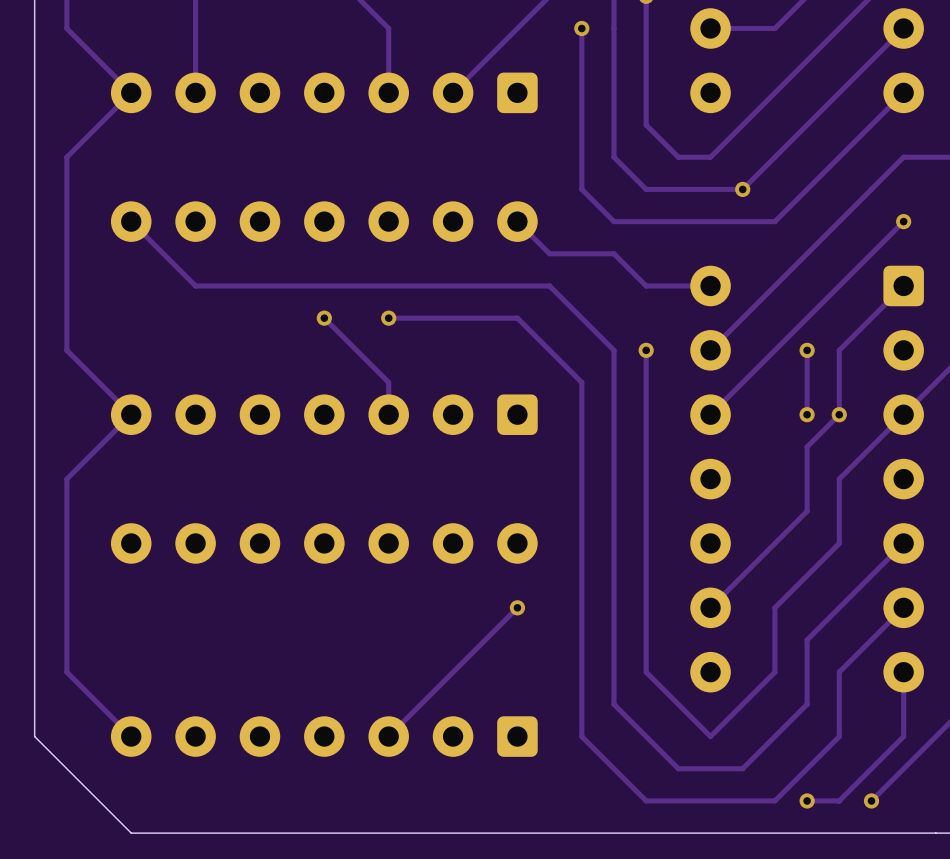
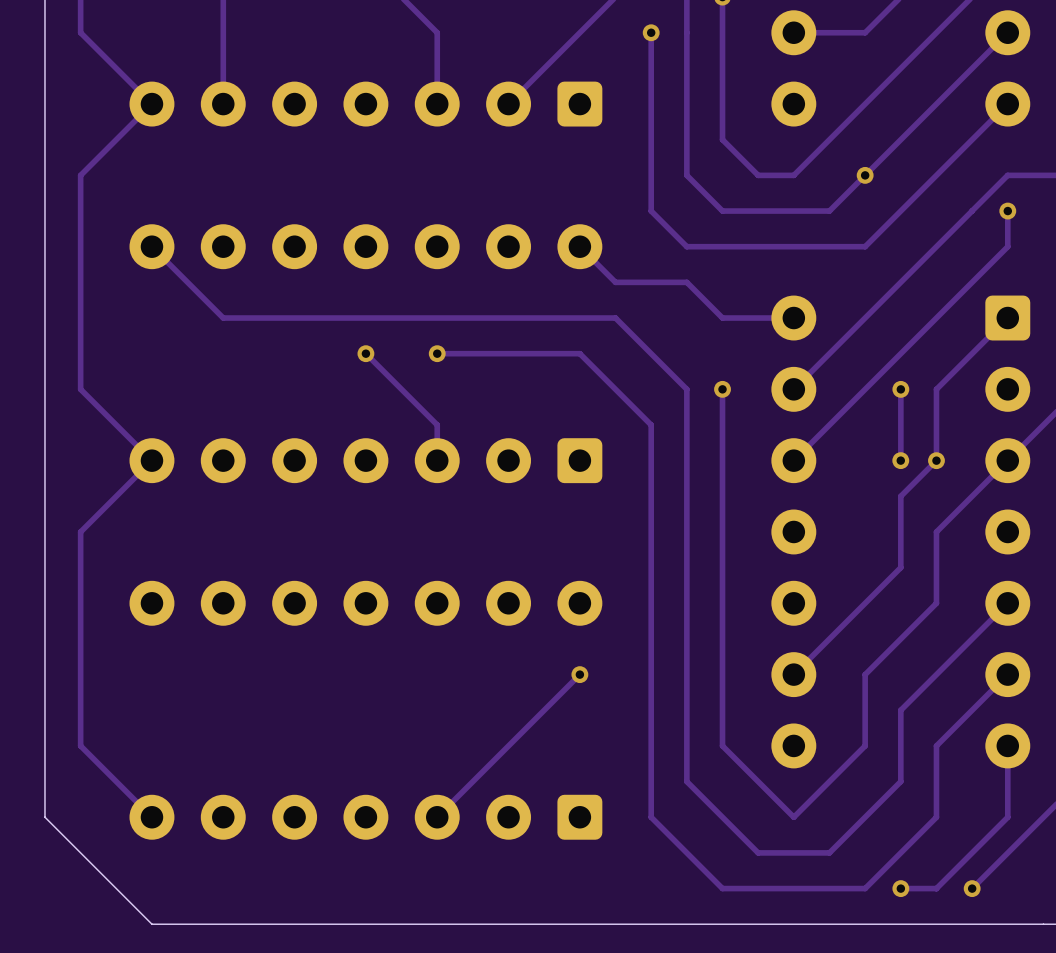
via position: (742, 189) -> (865, 175)
track: none -> (1007, 211) (1007, 246)
via position: (903, 221) -> (1007, 211)

